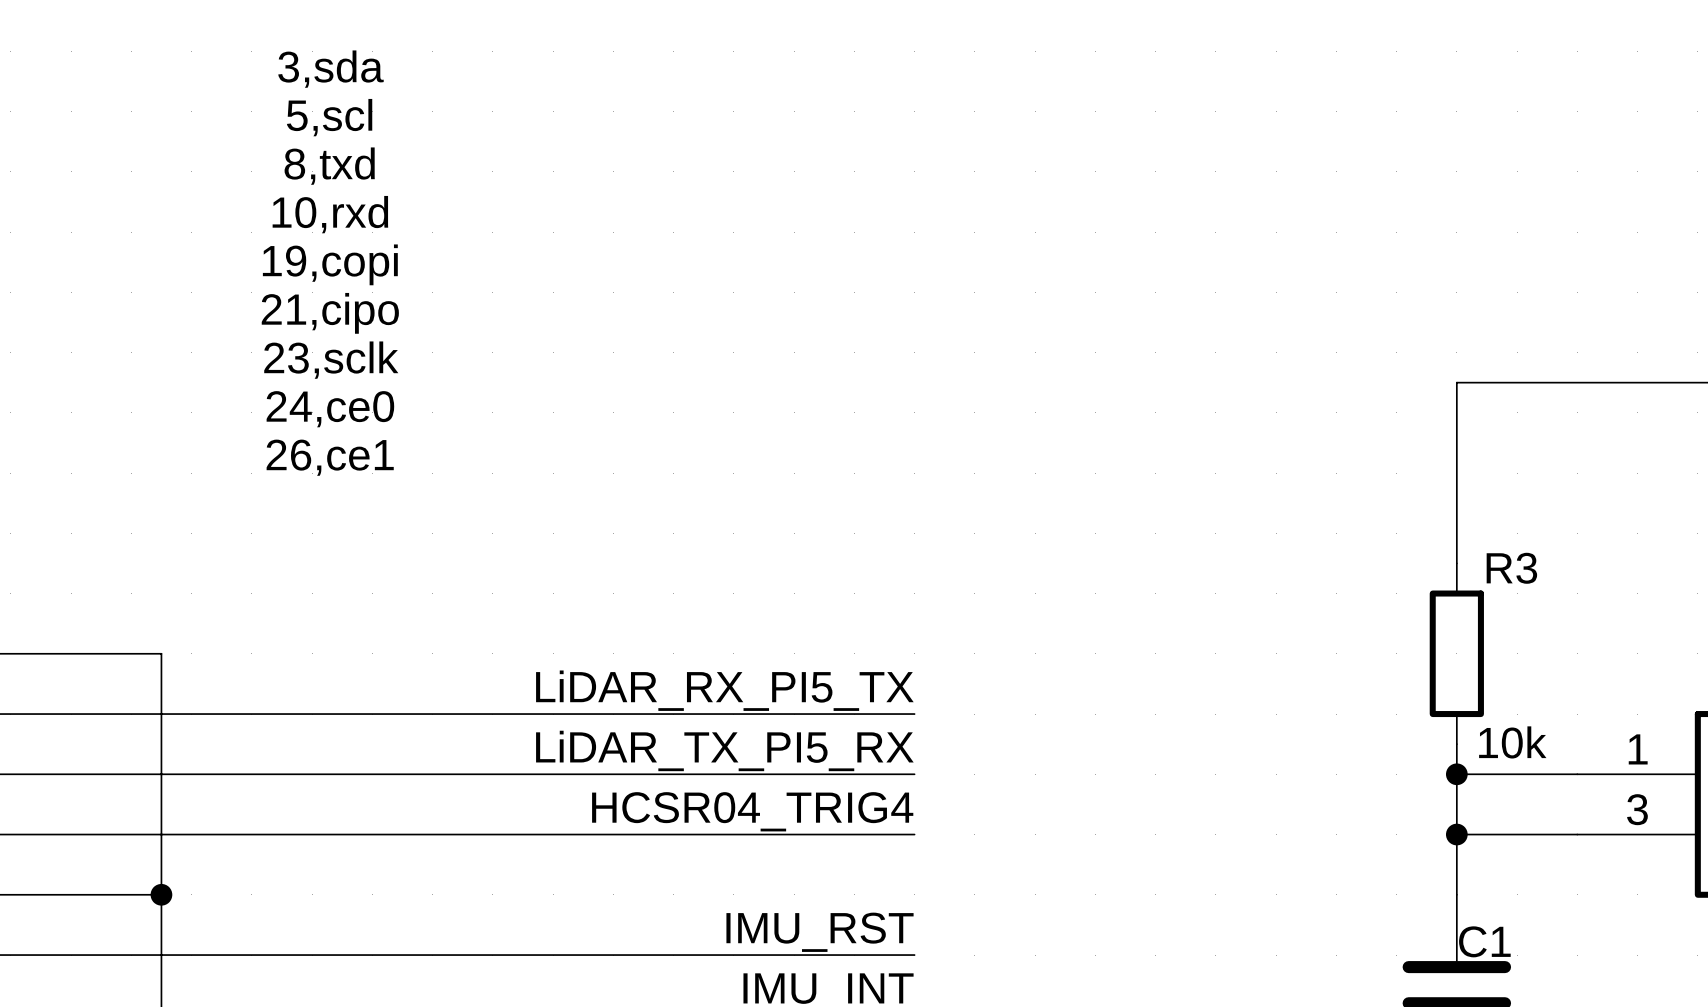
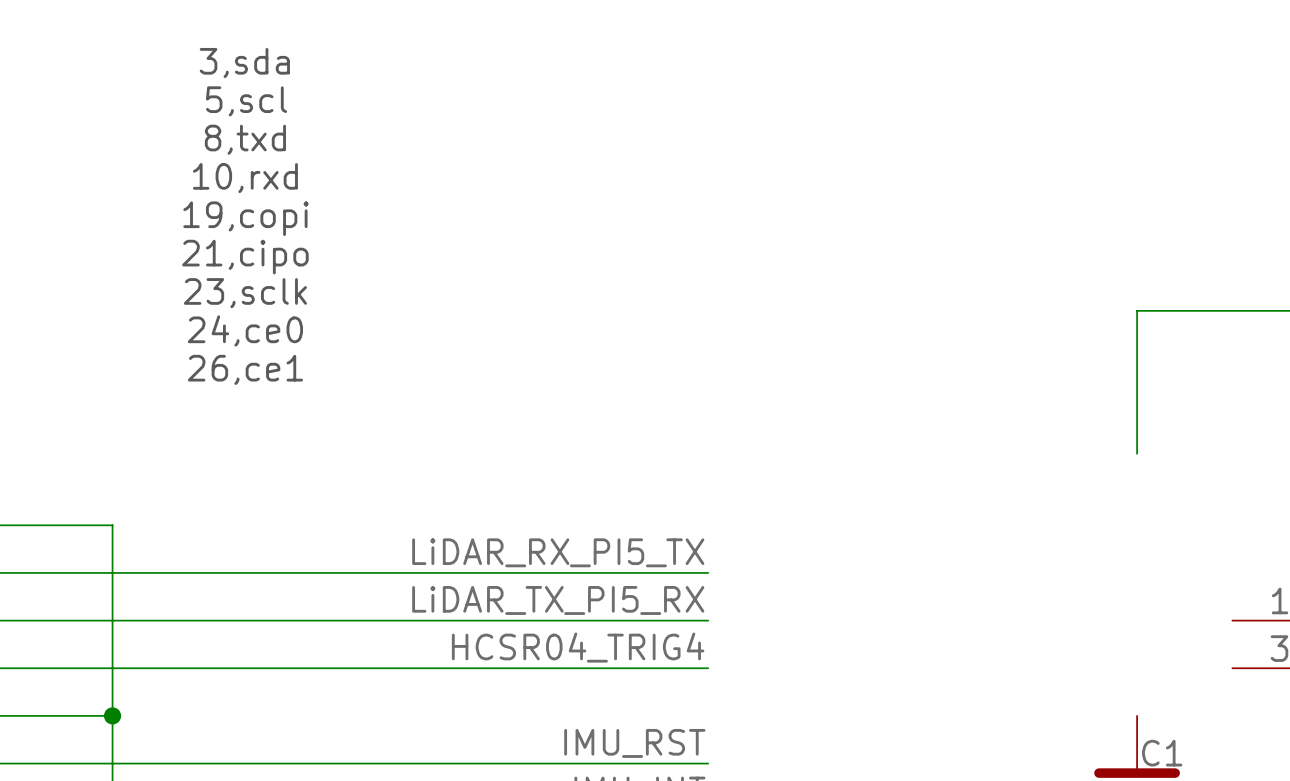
R3: 10k (1456, 653) -> none
wire: (1456, 744) (1456, 894) -> none
wire: (1456, 774) (1577, 774) -> none
junction: (1456, 774) -> none
wire: (1456, 834) (1577, 834) -> none
junction: (1456, 834) -> none

